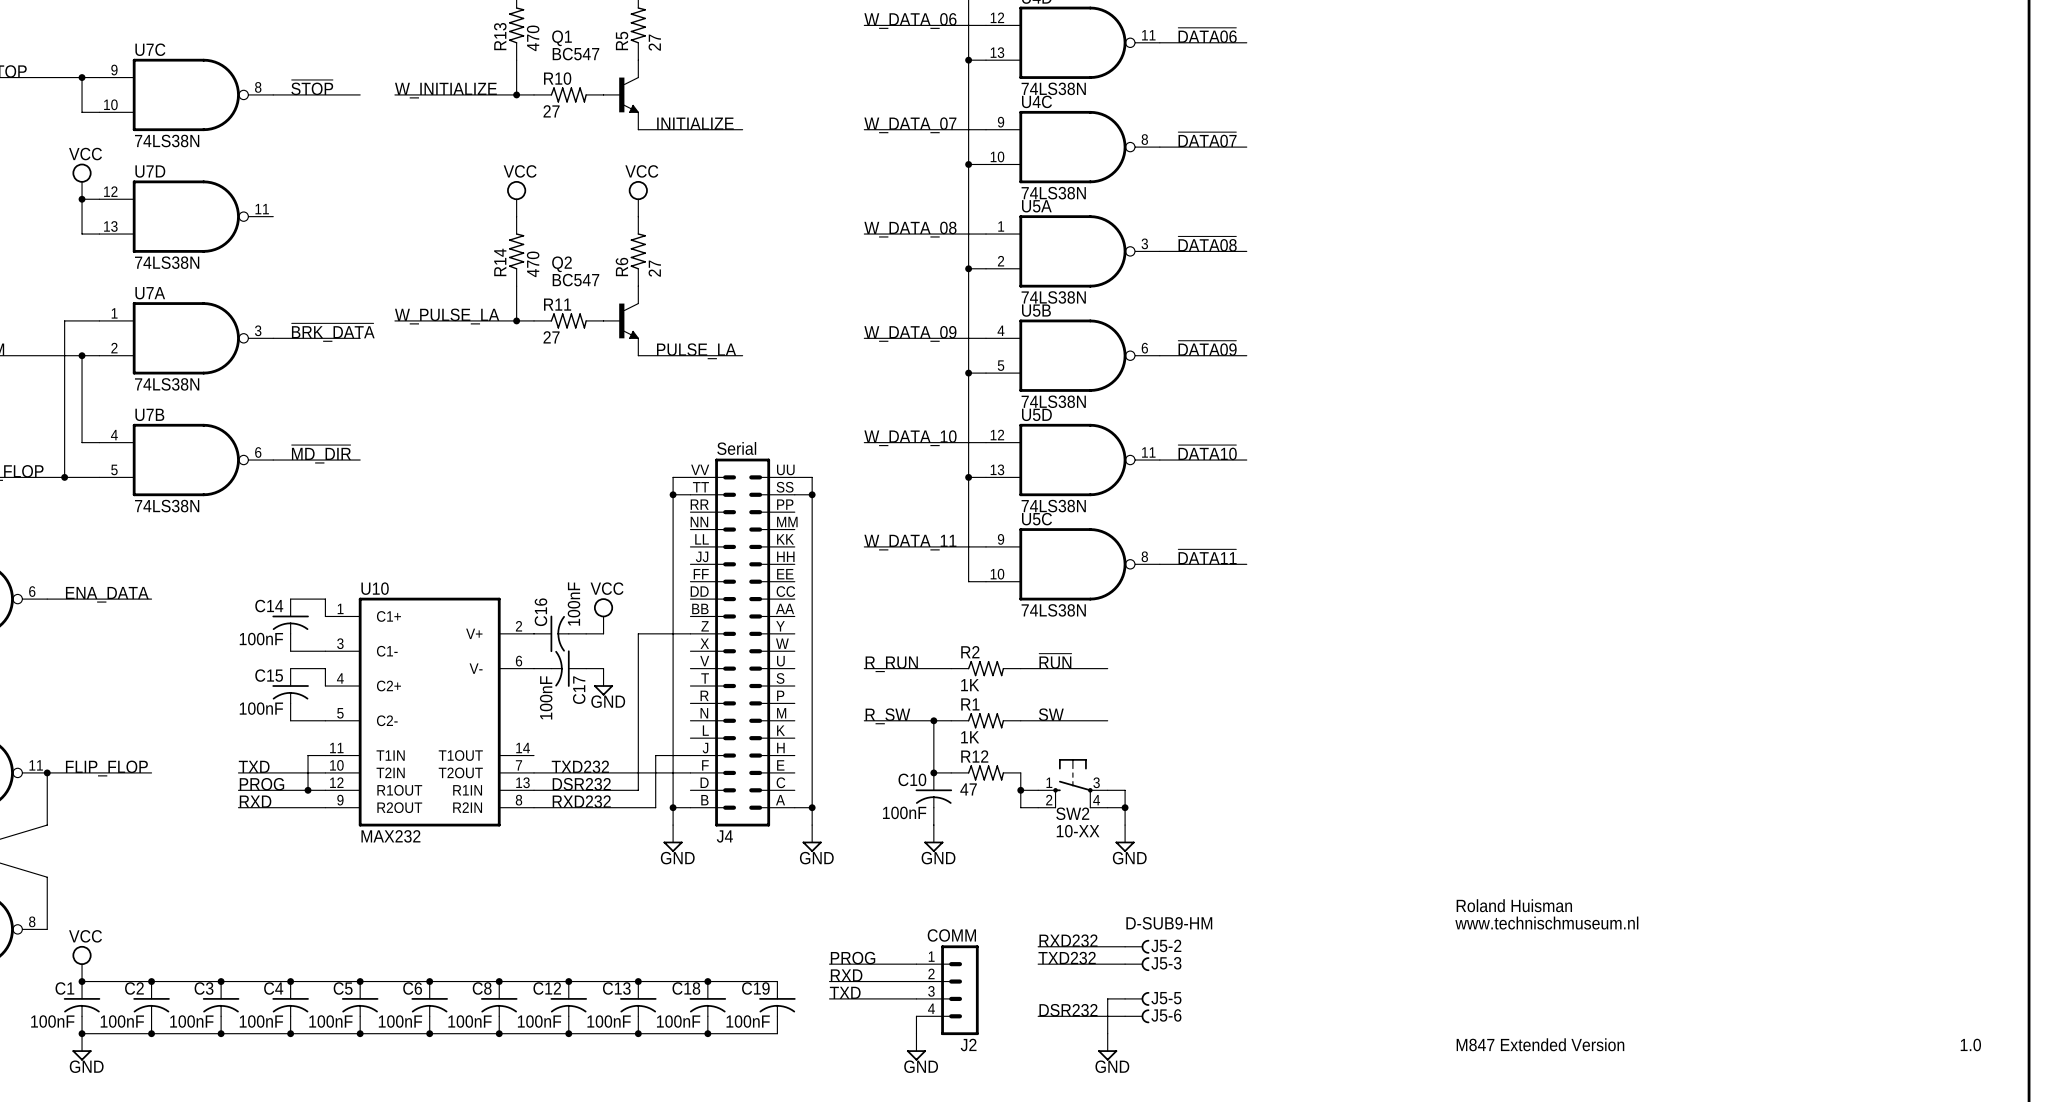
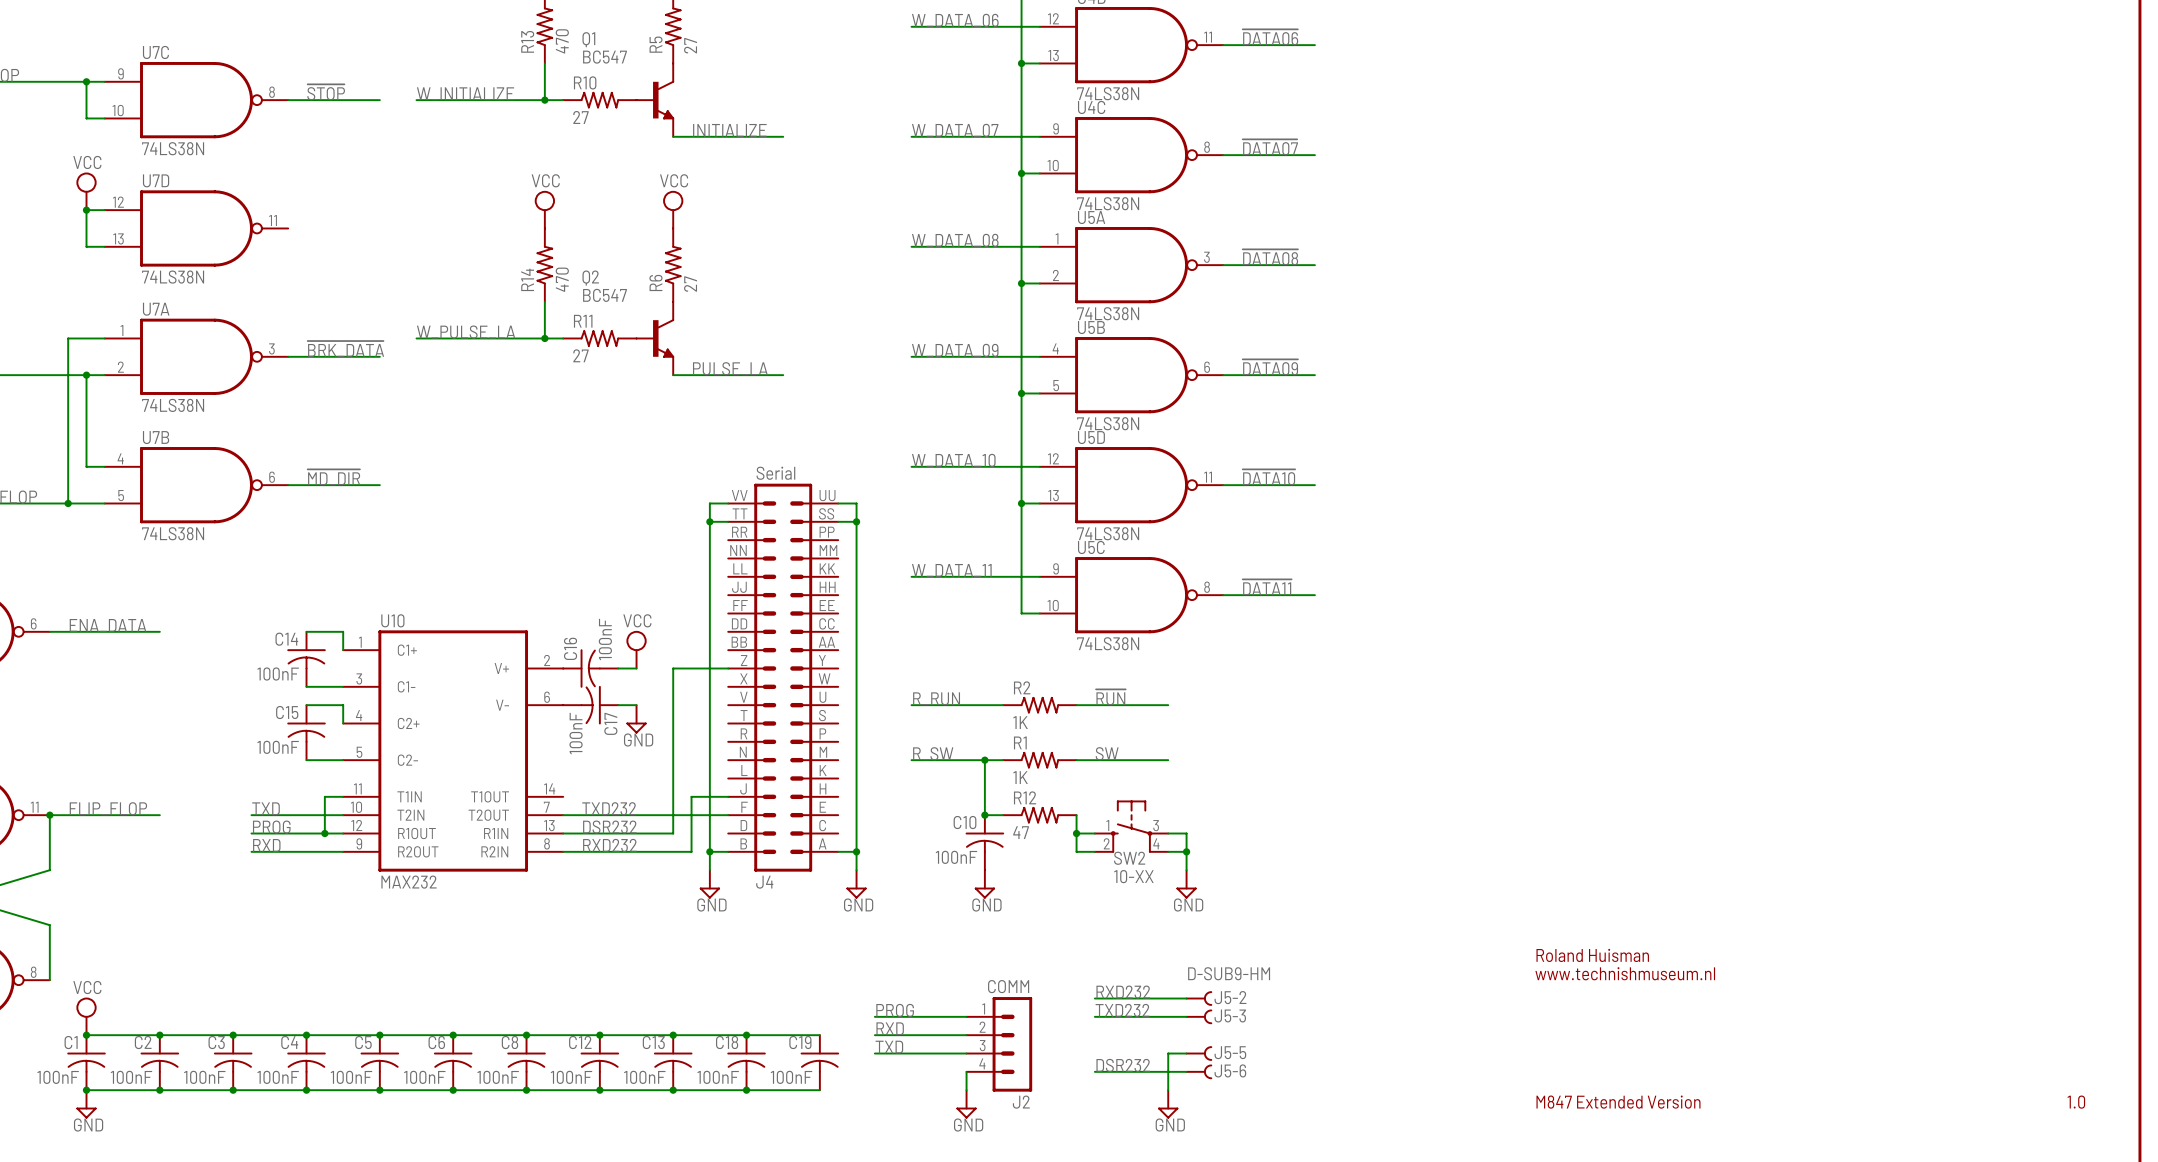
text: www.technischmuseum.nl (1546, 923) -> www.technishmuseum.nl (1625, 973)

